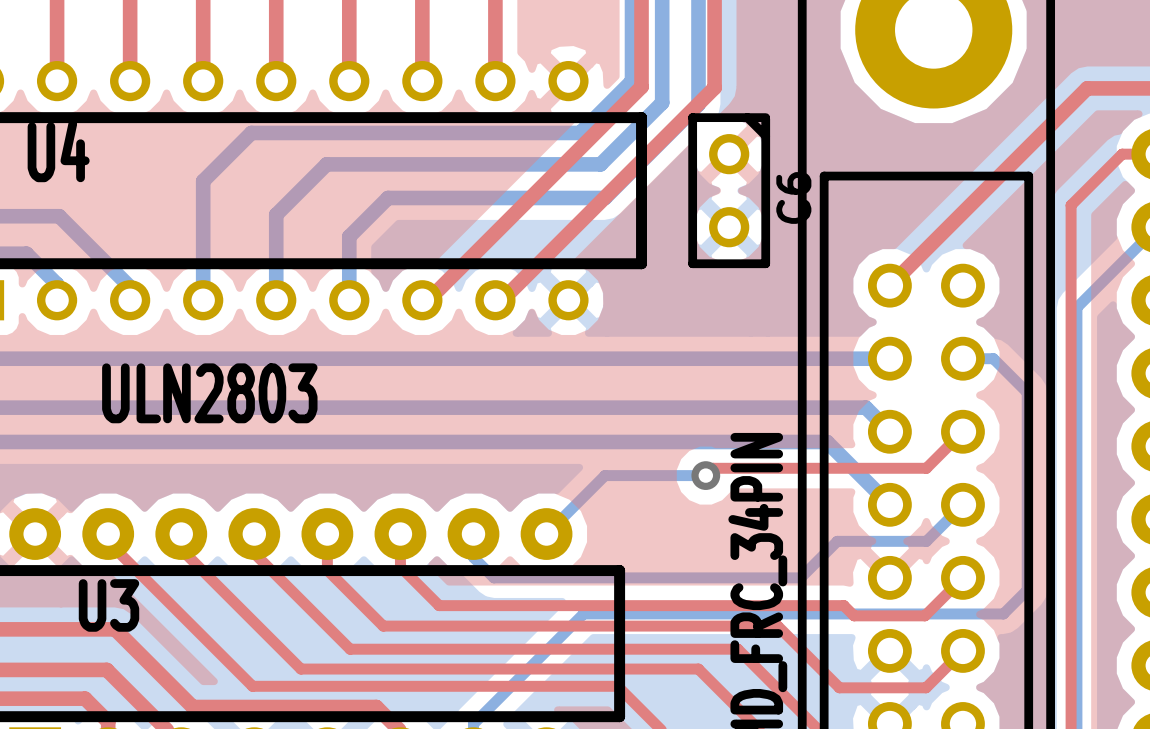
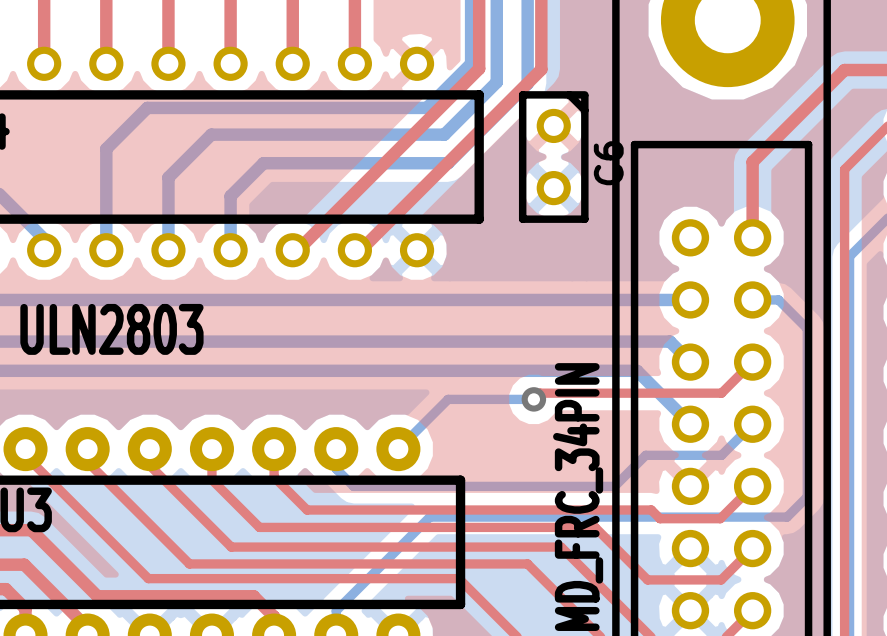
top track: (1087, 88) (889, 285) -> (858, 70) (844, 70) (752, 161) (752, 237)

